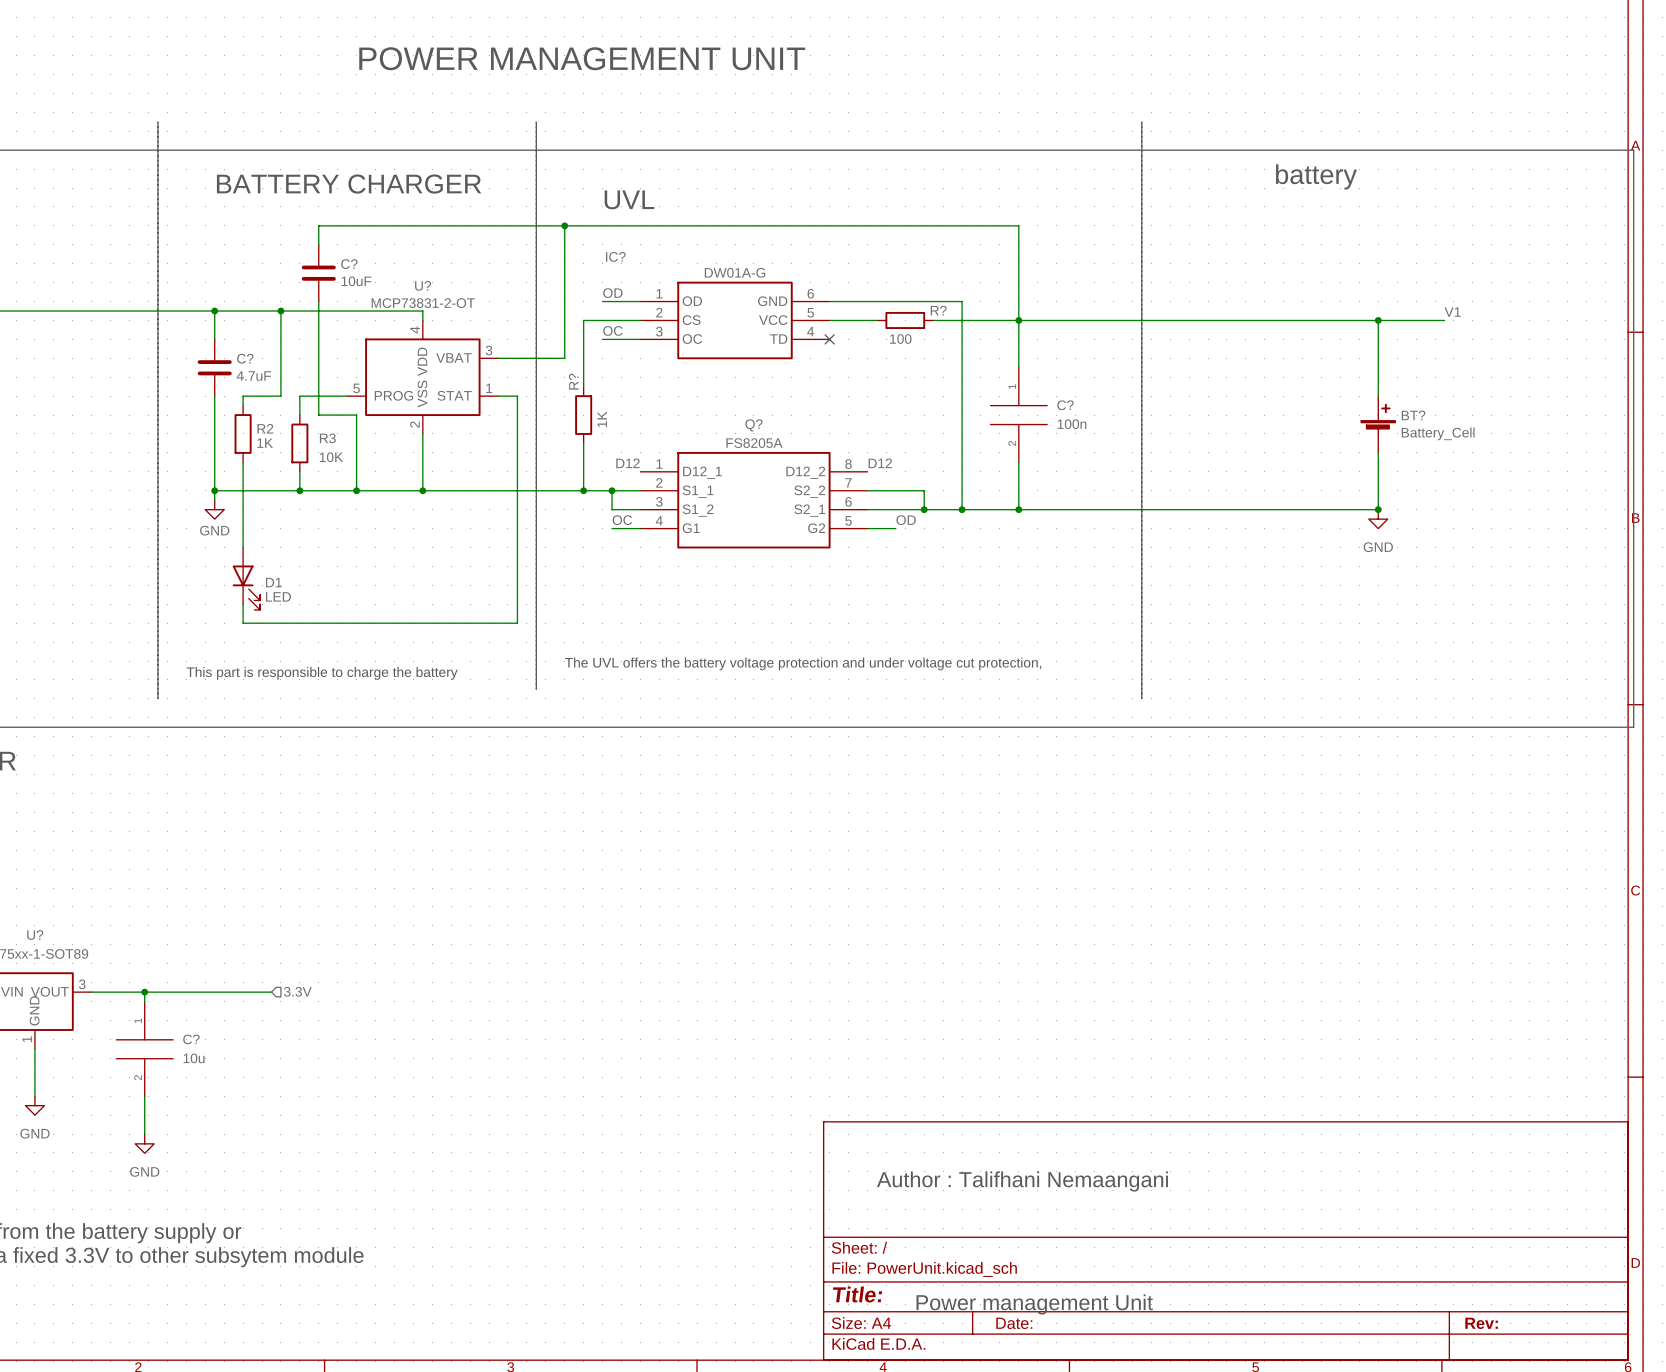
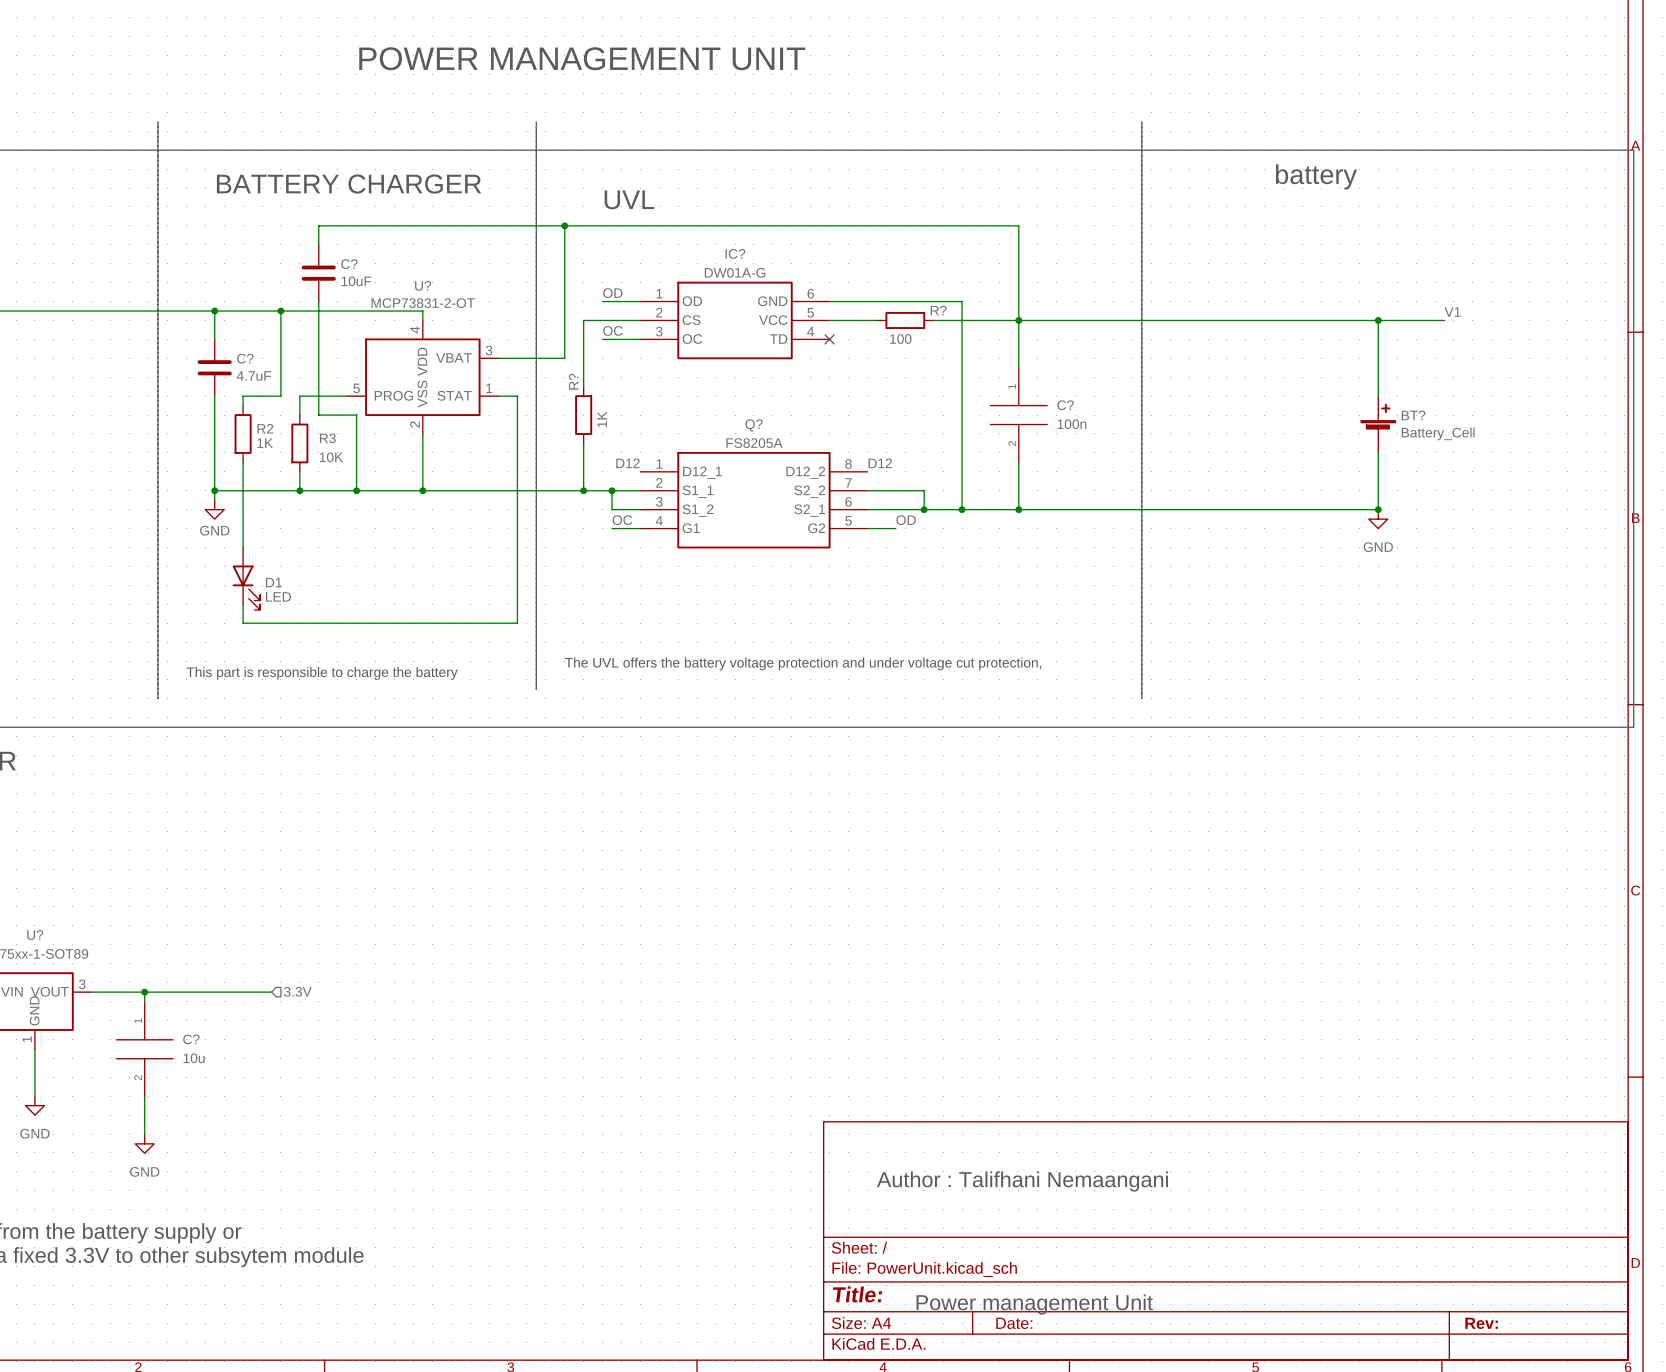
IC? name position: IC? (615, 256) -> IC? (735, 253)

